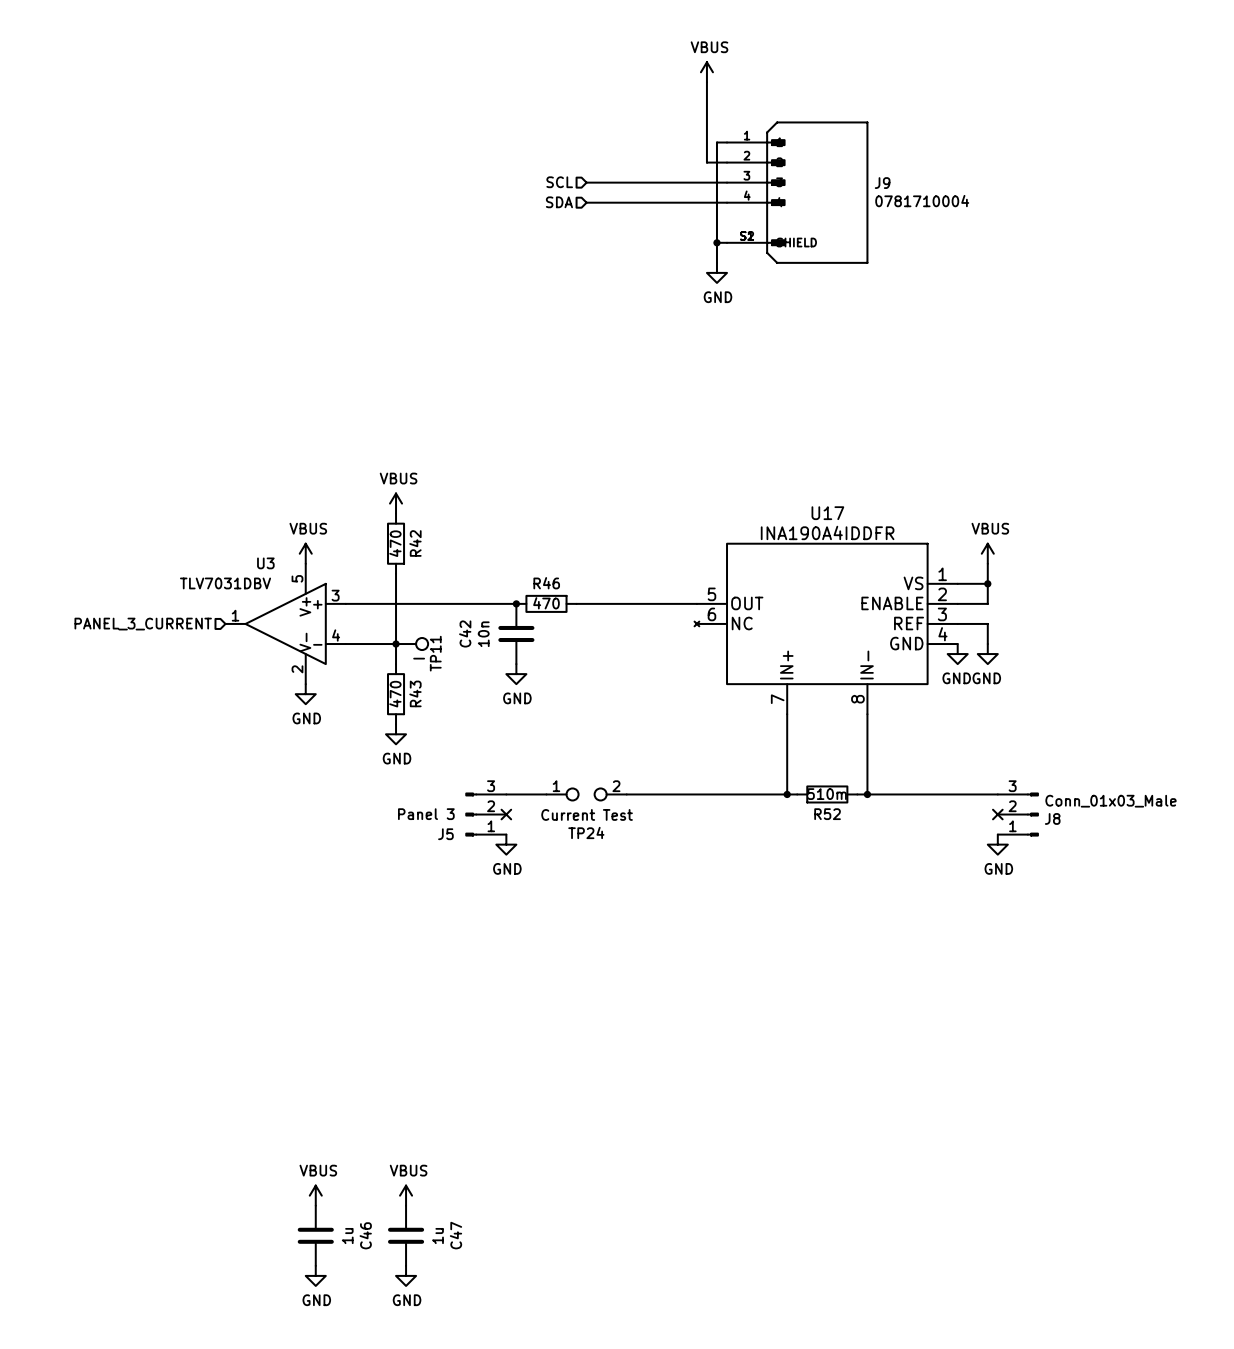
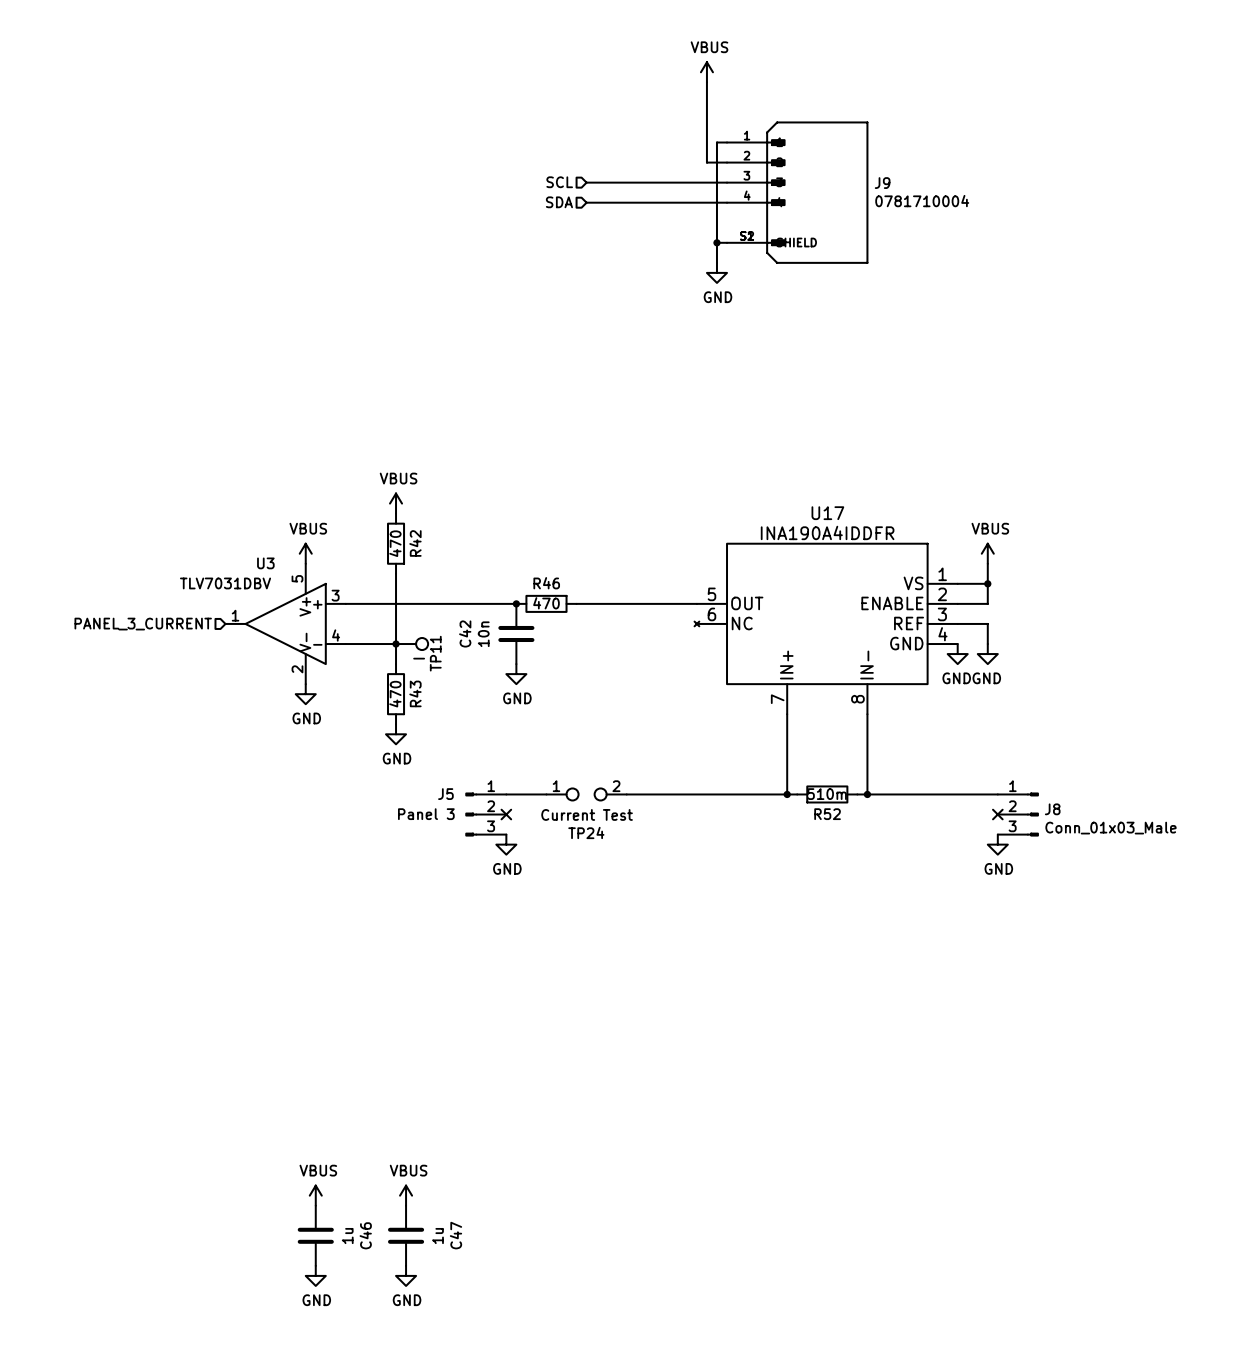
J5 flip: as is (471, 814) -> up-down (471, 814)
J8 flip: as is (1032, 814) -> up-down (1032, 814)

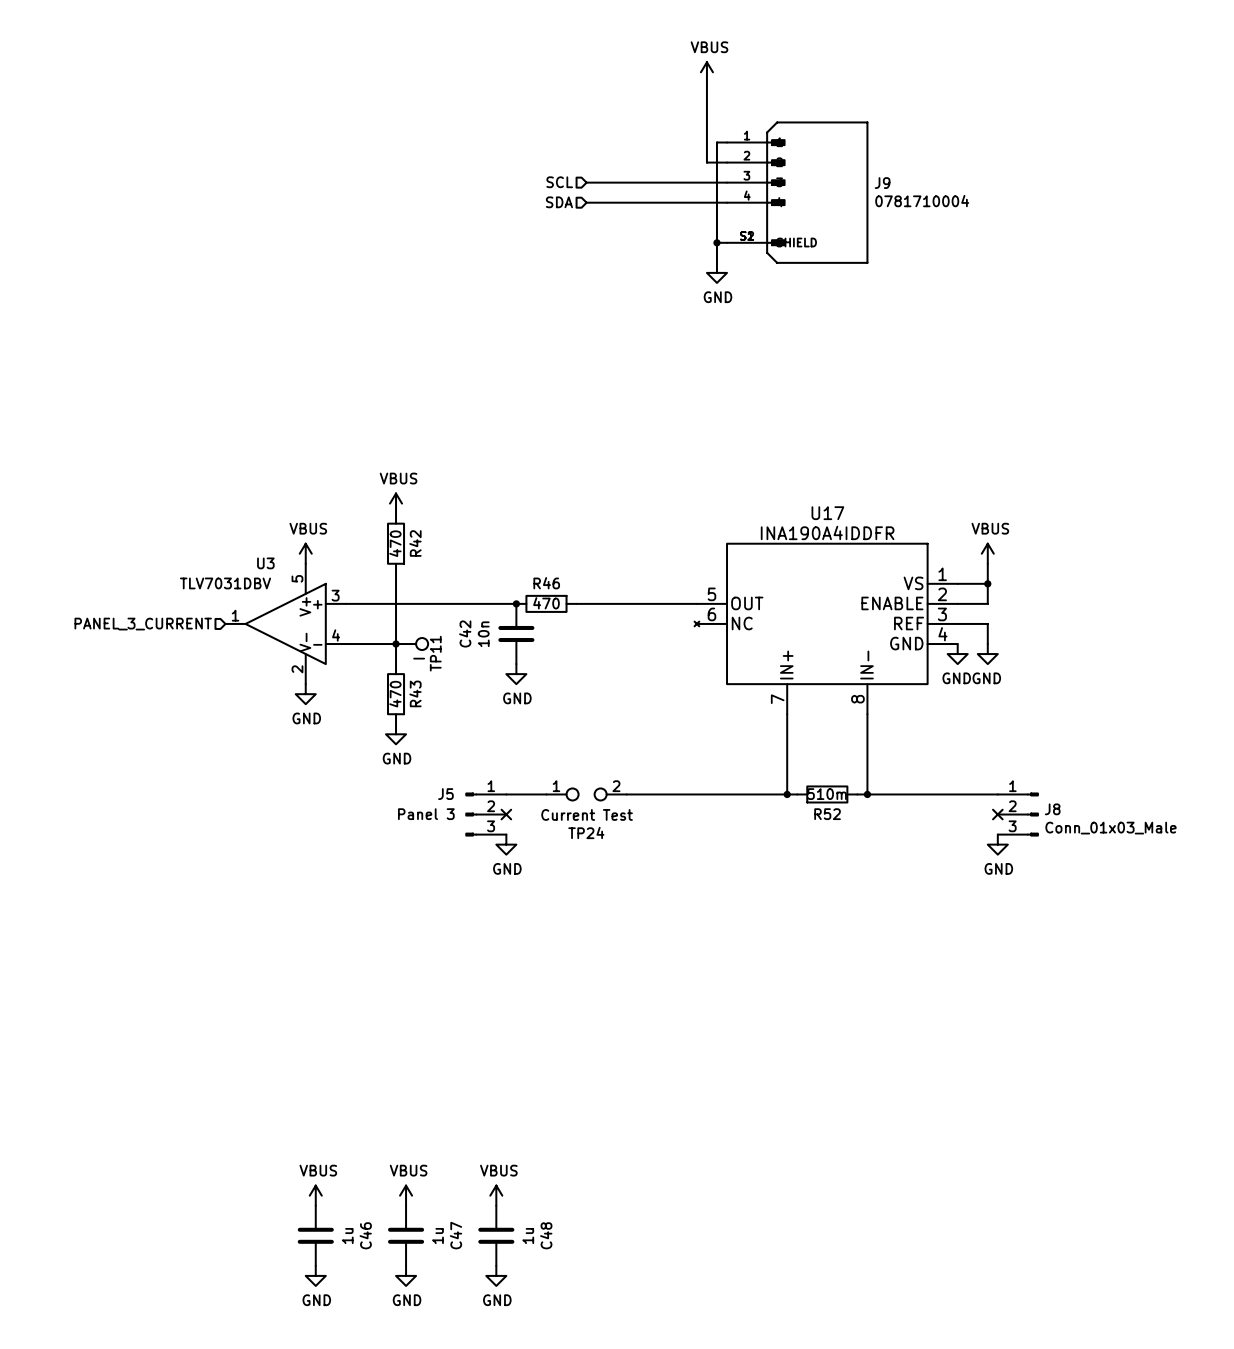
power symbol: none -> VBUS (496, 1195)
C48: none -> 1u (496, 1235)
power symbol: none -> GND (496, 1275)

